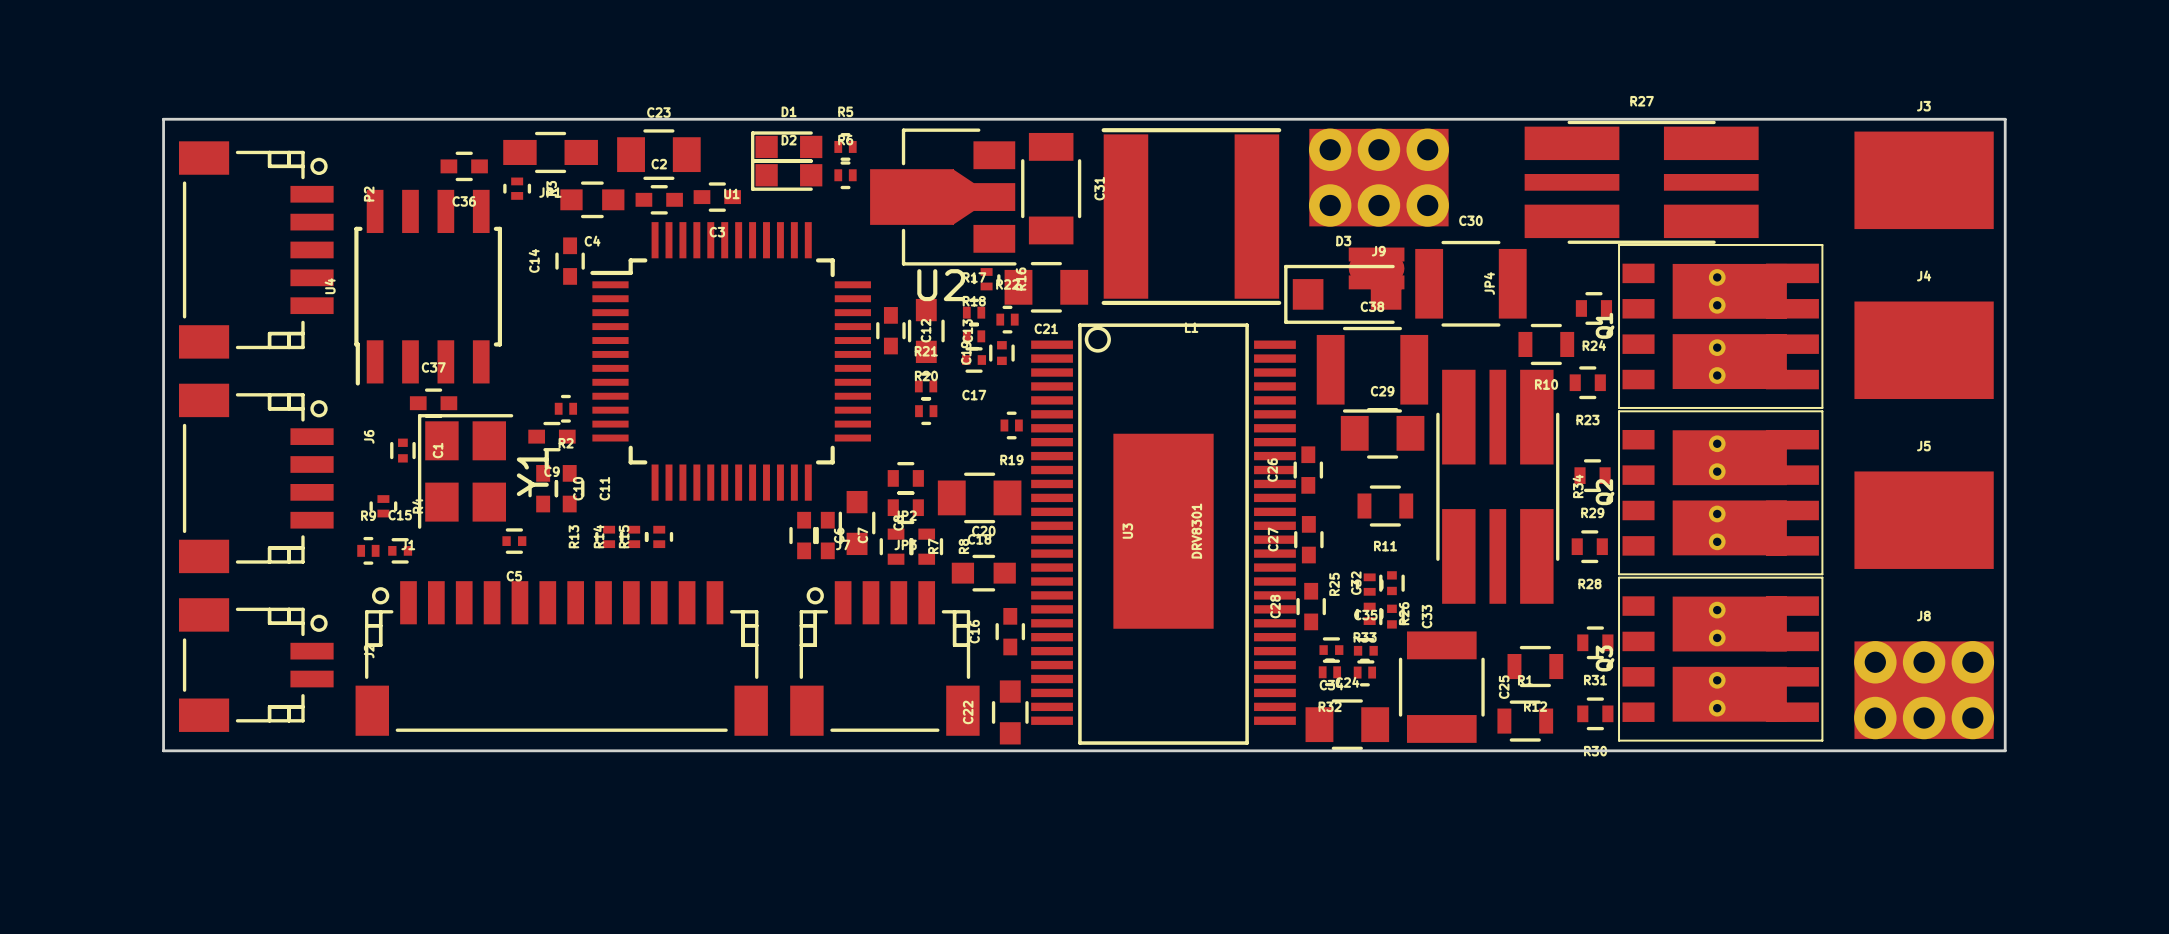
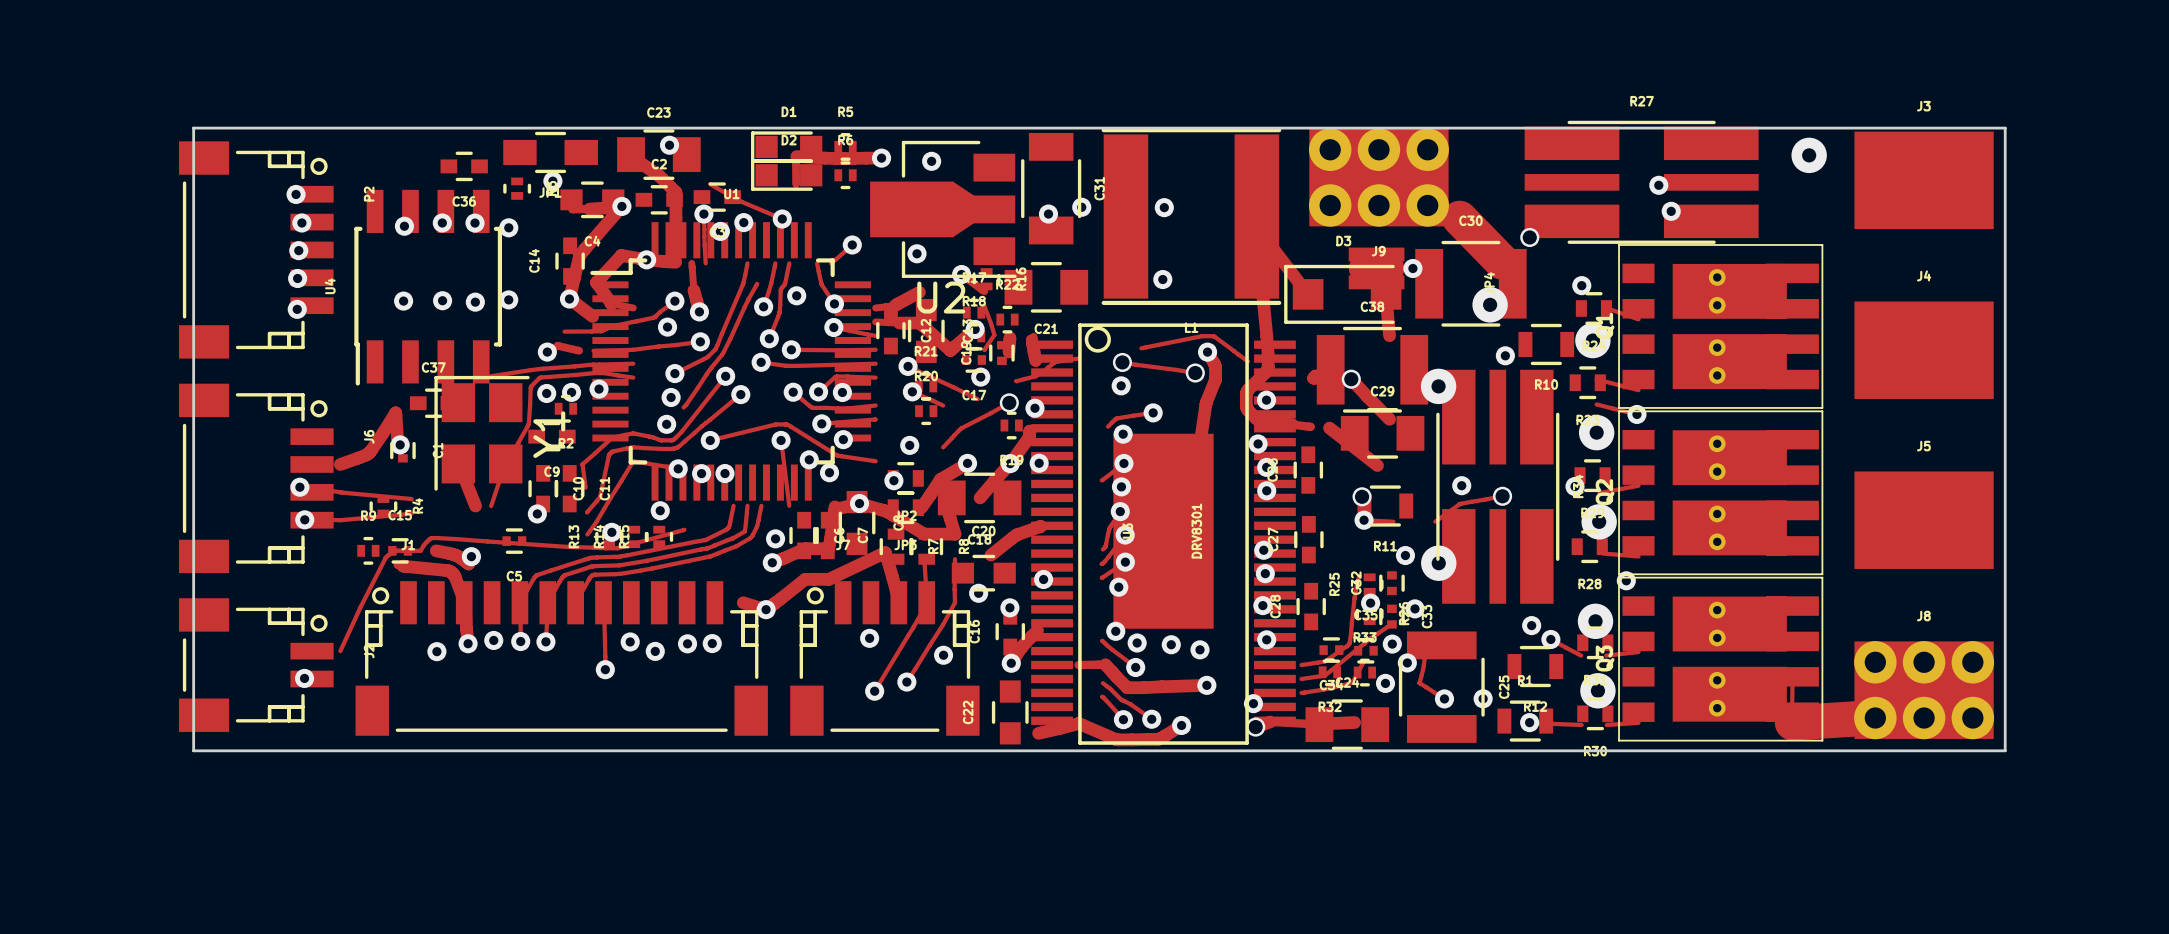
board edge: (2005, 128) (2005, 119) (163, 119) (163, 750) (193, 750) -> (2005, 128) (193, 128) (193, 750)
via: none -> (669, 145)
track: none -> (625, 152) (659, 175) (675, 192) (674, 261) (677, 263) (621, 255) (596, 282) (611, 303) (633, 308)
via: none -> (1809, 155)
track: none -> (881, 158) (837, 158) (796, 155) (796, 184)
via: none -> (881, 158)
via: none -> (931, 161)
via: none -> (552, 181)
track: none -> (710, 184) (741, 201) (787, 221)
via: none -> (1658, 185)
via: none -> (296, 194)
U2 position: (943, 197) -> (943, 209)
via: none -> (621, 206)
via: none -> (1081, 207)
via: none -> (1164, 207)
track: none -> (572, 209) (621, 206) (579, 255) (569, 298) (592, 316)
via: none -> (1671, 211)
track: none -> (703, 214) (705, 263)
via: none -> (703, 214)
via: none -> (1048, 214)
track: none -> (1459, 218) (1502, 262)
via: none -> (782, 219)
via: none -> (301, 222)
via: none -> (442, 222)
via: none -> (743, 222)
via: none -> (475, 223)
via: none -> (404, 226)
via: none -> (508, 227)
via: none -> (720, 231)
via: none -> (1529, 237)
track: none -> (852, 245) (831, 263)
via: none -> (852, 245)
via: none -> (298, 250)
via: none -> (917, 253)
via: none -> (646, 259)
track: none -> (691, 263) (693, 290) (699, 311)
track: none -> (747, 263) (743, 283) (715, 348) (707, 357) (674, 373)
track: none -> (775, 263) (763, 306)
track: none -> (789, 263) (785, 283) (780, 290) (779, 313) (769, 338)
track: none -> (817, 263) (821, 283) (834, 303)
via: none -> (1412, 268)
track: none -> (961, 274) (984, 291)
via: none -> (961, 274)
via: none -> (297, 278)
via: none -> (1162, 279)
track: none -> (757, 283) (723, 353) (683, 407)
via: none -> (1581, 285)
track: none -> (919, 292) (895, 305) (875, 308)
track: none -> (1308, 294) (1256, 227) (1268, 366) (1266, 372) (1247, 390) (1246, 407) (1258, 419) (1310, 426)
track: none -> (1386, 294) (1389, 335)
via: none -> (796, 295)
via: none -> (508, 299)
via: none -> (569, 299)
via: none -> (442, 300)
via: none -> (403, 301)
track: none -> (674, 301) (653, 317) (613, 326) (602, 330)
via: none -> (674, 301)
via: none -> (475, 302)
via: none -> (834, 303)
via: none -> (1490, 304)
track: none -> (984, 305) (994, 335) (984, 350)
via: none -> (763, 306)
track: none -> (1606, 308) (1638, 319)
via: none -> (297, 309)
via: none -> (699, 311)
track: none -> (875, 321) (919, 322) (950, 350) (975, 329)
via: none -> (667, 327)
track: none -> (833, 327) (875, 335)
via: none -> (833, 327)
via: none -> (975, 329)
track: none -> (601, 331) (564, 331)
track: none -> (1008, 335) (1009, 352)
via: none -> (769, 338)
track: none -> (1030, 338) (1033, 337) (1032, 341) (1035, 360)
via: none -> (1592, 340)
track: none -> (700, 341) (633, 349) (593, 350)
via: none -> (700, 341)
track: none -> (557, 345) (579, 350)
track: none -> (1141, 348) (1202, 336) (1213, 336) (1247, 361)
track: none -> (791, 349) (875, 349)
via: none -> (791, 349)
via: none -> (547, 352)
track: none -> (1207, 352) (1215, 365) (1215, 378) (1205, 403) (1190, 531)
via: none -> (1207, 352)
via: none -> (1505, 355)
track: none -> (1078, 358) (1054, 362) (1035, 376) (1016, 381)
track: none -> (761, 362) (795, 365) (875, 363)
via: none -> (761, 362)
track: none -> (1122, 362) (1195, 373)
via: none -> (1122, 362)
track: none -> (633, 363) (542, 368) (486, 377)
track: none -> (908, 366) (977, 399)
via: none -> (908, 366)
via: none -> (674, 373)
via: none -> (1195, 373)
track: none -> (1315, 375) (1313, 378) (1351, 379) (1389, 419)
track: none -> (725, 376) (673, 439) (660, 440) (633, 433) (611, 438) (582, 464) (585, 487)
via: none -> (725, 376)
track: none -> (633, 377) (593, 373) (539, 378) (530, 387) (528, 424) (505, 463) (491, 506)
track: none -> (875, 377) (836, 376) (818, 391)
via: none -> (980, 377)
via: none -> (1351, 379)
track: none -> (1596, 379) (1638, 390)
via: none -> (1121, 385)
via: none -> (1438, 386)
via: none -> (599, 389)
track: none -> (907, 389) (943, 405)
via: none -> (818, 391)
via: none -> (912, 391)
via: none -> (571, 392)
track: none -> (793, 392) (813, 407) (846, 408) (875, 405)
via: none -> (793, 392)
via: none -> (842, 392)
via: none -> (546, 393)
track: none -> (740, 394) (676, 447)
via: none -> (740, 394)
via: none -> (671, 397)
via: none -> (1266, 400)
track: none -> (1009, 402) (961, 428) (943, 447)
via: none -> (1009, 402)
track: none -> (1596, 404) (1636, 414)
via: none -> (1034, 408)
track: none -> (1153, 412) (1117, 418)
via: none -> (1153, 412)
via: none -> (1636, 414)
track: none -> (1116, 418) (1108, 426)
track: none -> (875, 419) (821, 423)
via: none -> (821, 423)
via: none -> (666, 424)
track: none -> (775, 424) (786, 424)
track: none -> (775, 424) (710, 440)
track: none -> (786, 424) (837, 455) (875, 461)
track: none -> (1329, 428) (1377, 465)
track: none -> (1029, 431) (1028, 438) (1011, 462) (980, 497)
via: none -> (1596, 432)
via: none -> (1123, 434)
via: none -> (843, 439)
via: none -> (710, 440)
track: none -> (781, 440) (789, 505)
via: none -> (781, 440)
via: none -> (1258, 443)
track: none -> (400, 444) (398, 445) (395, 412) (369, 452) (340, 464)
via: none -> (400, 444)
via: none -> (909, 445)
track: none -> (676, 448) (633, 447) (612, 451)
track: none -> (612, 451) (608, 456) (600, 496)
via: none -> (809, 459)
track: none -> (458, 463) (475, 506)
track: none -> (967, 463) (940, 479) (921, 507)
via: none -> (967, 463)
via: none -> (1010, 463)
via: none -> (1039, 463)
track: none -> (1123, 463) (1101, 480)
via: none -> (1123, 463)
via: none -> (1266, 467)
track: none -> (678, 468) (633, 461) (587, 534)
via: none -> (678, 468)
Y1 position: (465, 471) -> (482, 433)
via: none -> (829, 472)
via: none -> (701, 473)
via: none -> (724, 473)
via: none -> (893, 480)
via: none -> (1461, 485)
track: none -> (1638, 485) (1599, 493)
via: none -> (1121, 486)
via: none -> (1575, 486)
track: none -> (299, 487) (411, 499)
via: none -> (299, 487)
via: none -> (1266, 490)
track: none -> (600, 496) (587, 512)
via: none -> (1362, 496)
track: none -> (1502, 496) (1460, 504) (1435, 521)
via: none -> (1502, 496)
via: none -> (859, 503)
track: none -> (733, 505) (728, 527) (705, 539)
track: none -> (747, 505) (744, 531) (714, 545)
track: none -> (761, 505) (757, 526) (752, 536) (736, 546) (709, 556) (652, 568) (620, 573) (593, 574) (576, 602)
track: none -> (946, 507) (955, 534) (924, 534) (885, 510) (859, 503) (840, 508) (835, 506) (828, 548) (805, 548) (772, 562)
via: none -> (660, 510)
track: none -> (1120, 511) (1109, 528) (1105, 545) (1102, 549)
via: none -> (1120, 511)
track: none -> (411, 513) (340, 520) (304, 519)
via: none -> (537, 513)
via: none -> (304, 519)
track: none -> (1364, 520) (1393, 521)
via: none -> (1364, 520)
via: none -> (1599, 521)
track: none -> (1040, 526) (1015, 535) (991, 555)
track: none -> (684, 529) (617, 548) (430, 538) (420, 550) (397, 550) (385, 557) (340, 651)
via: none -> (611, 532)
track: none -> (1125, 535) (1101, 564)
via: none -> (1125, 535)
via: none -> (775, 538)
track: none -> (705, 540) (621, 556) (591, 557) (536, 575) (520, 602) (520, 641)
track: none -> (714, 545) (707, 548)
track: none -> (707, 548) (619, 565) (592, 566)
track: none -> (436, 550) (456, 555) (468, 564) (471, 556)
via: none -> (1263, 550)
track: none -> (1602, 553) (1638, 556)
via: none -> (1405, 555)
via: none -> (471, 556)
track: none -> (924, 559) (927, 602) (874, 691)
track: none -> (955, 559) (955, 602) (906, 682)
via: none -> (772, 562)
track: none -> (1125, 562) (1101, 577)
via: none -> (1125, 562)
via: none -> (1438, 563)
track: none -> (397, 565) (447, 570) (454, 575) (464, 602) (468, 643)
track: none -> (592, 566) (565, 575) (561, 577) (548, 602) (545, 641)
via: none -> (1265, 573)
track: none -> (1359, 575) (1354, 596) (1349, 643) (1324, 661) (1301, 665)
via: none -> (1043, 579)
via: none -> (1626, 580)
via: none -> (1118, 587)
via: none -> (978, 593)
track: none -> (603, 602) (605, 669)
track: none -> (743, 602) (766, 609) (805, 579) (828, 579) (885, 552) (899, 602)
via: none -> (1370, 603)
via: none -> (1262, 605)
via: none -> (1009, 607)
via: none -> (1415, 608)
via: none -> (766, 609)
via: none -> (1595, 621)
track: none -> (1393, 622) (1370, 638) (1325, 674) (1301, 679)
via: none -> (1531, 625)
track: none -> (1037, 630) (1022, 646) (1011, 663)
via: none -> (1115, 631)
via: none -> (869, 638)
track: none -> (1427, 638) (1419, 683) (1444, 698)
via: none -> (1266, 639)
track: none -> (1550, 639) (1581, 655)
via: none -> (1550, 639)
via: none -> (493, 640)
track: none -> (1101, 640) (1135, 667)
via: none -> (520, 641)
via: none -> (545, 641)
via: none -> (630, 641)
via: none -> (1137, 642)
via: none -> (468, 643)
via: none -> (687, 643)
via: none -> (712, 643)
via: none -> (1171, 644)
via: none -> (1392, 644)
via: none -> (1200, 649)
via: none -> (436, 651)
via: none -> (655, 651)
track: none -> (1638, 652) (1606, 655)
via: none -> (943, 655)
track: none -> (1364, 661) (1352, 682) (1301, 692)
via: none -> (1407, 662)
via: none -> (1011, 663)
track: none -> (1078, 665) (1105, 664) (1127, 687) (1206, 685)
via: none -> (1135, 667)
via: none -> (605, 669)
via: none -> (304, 678)
via: none -> (906, 682)
track: none -> (1102, 683) (1121, 699) (1151, 719)
via: none -> (1385, 683)
via: none -> (1206, 685)
track: none -> (1792, 687) (1792, 722) (1862, 718) (1924, 718)
via: none -> (1597, 690)
via: none -> (874, 691)
track: none -> (1102, 696) (1123, 719)
via: none -> (1444, 698)
via: none -> (1483, 698)
via: none -> (1253, 703)
via: none -> (1123, 719)
via: none -> (1151, 719)
track: none -> (1354, 722) (1311, 724) (1270, 722) (1255, 727)
track: none -> (1529, 722) (1581, 724)
via: none -> (1529, 722)
track: none -> (1638, 722) (1606, 724)
track: none -> (1181, 725) (1156, 739) (1116, 739) (1082, 724) (1078, 720) (1075, 724) (1038, 733)
via: none -> (1181, 725)
via: none -> (1255, 727)

